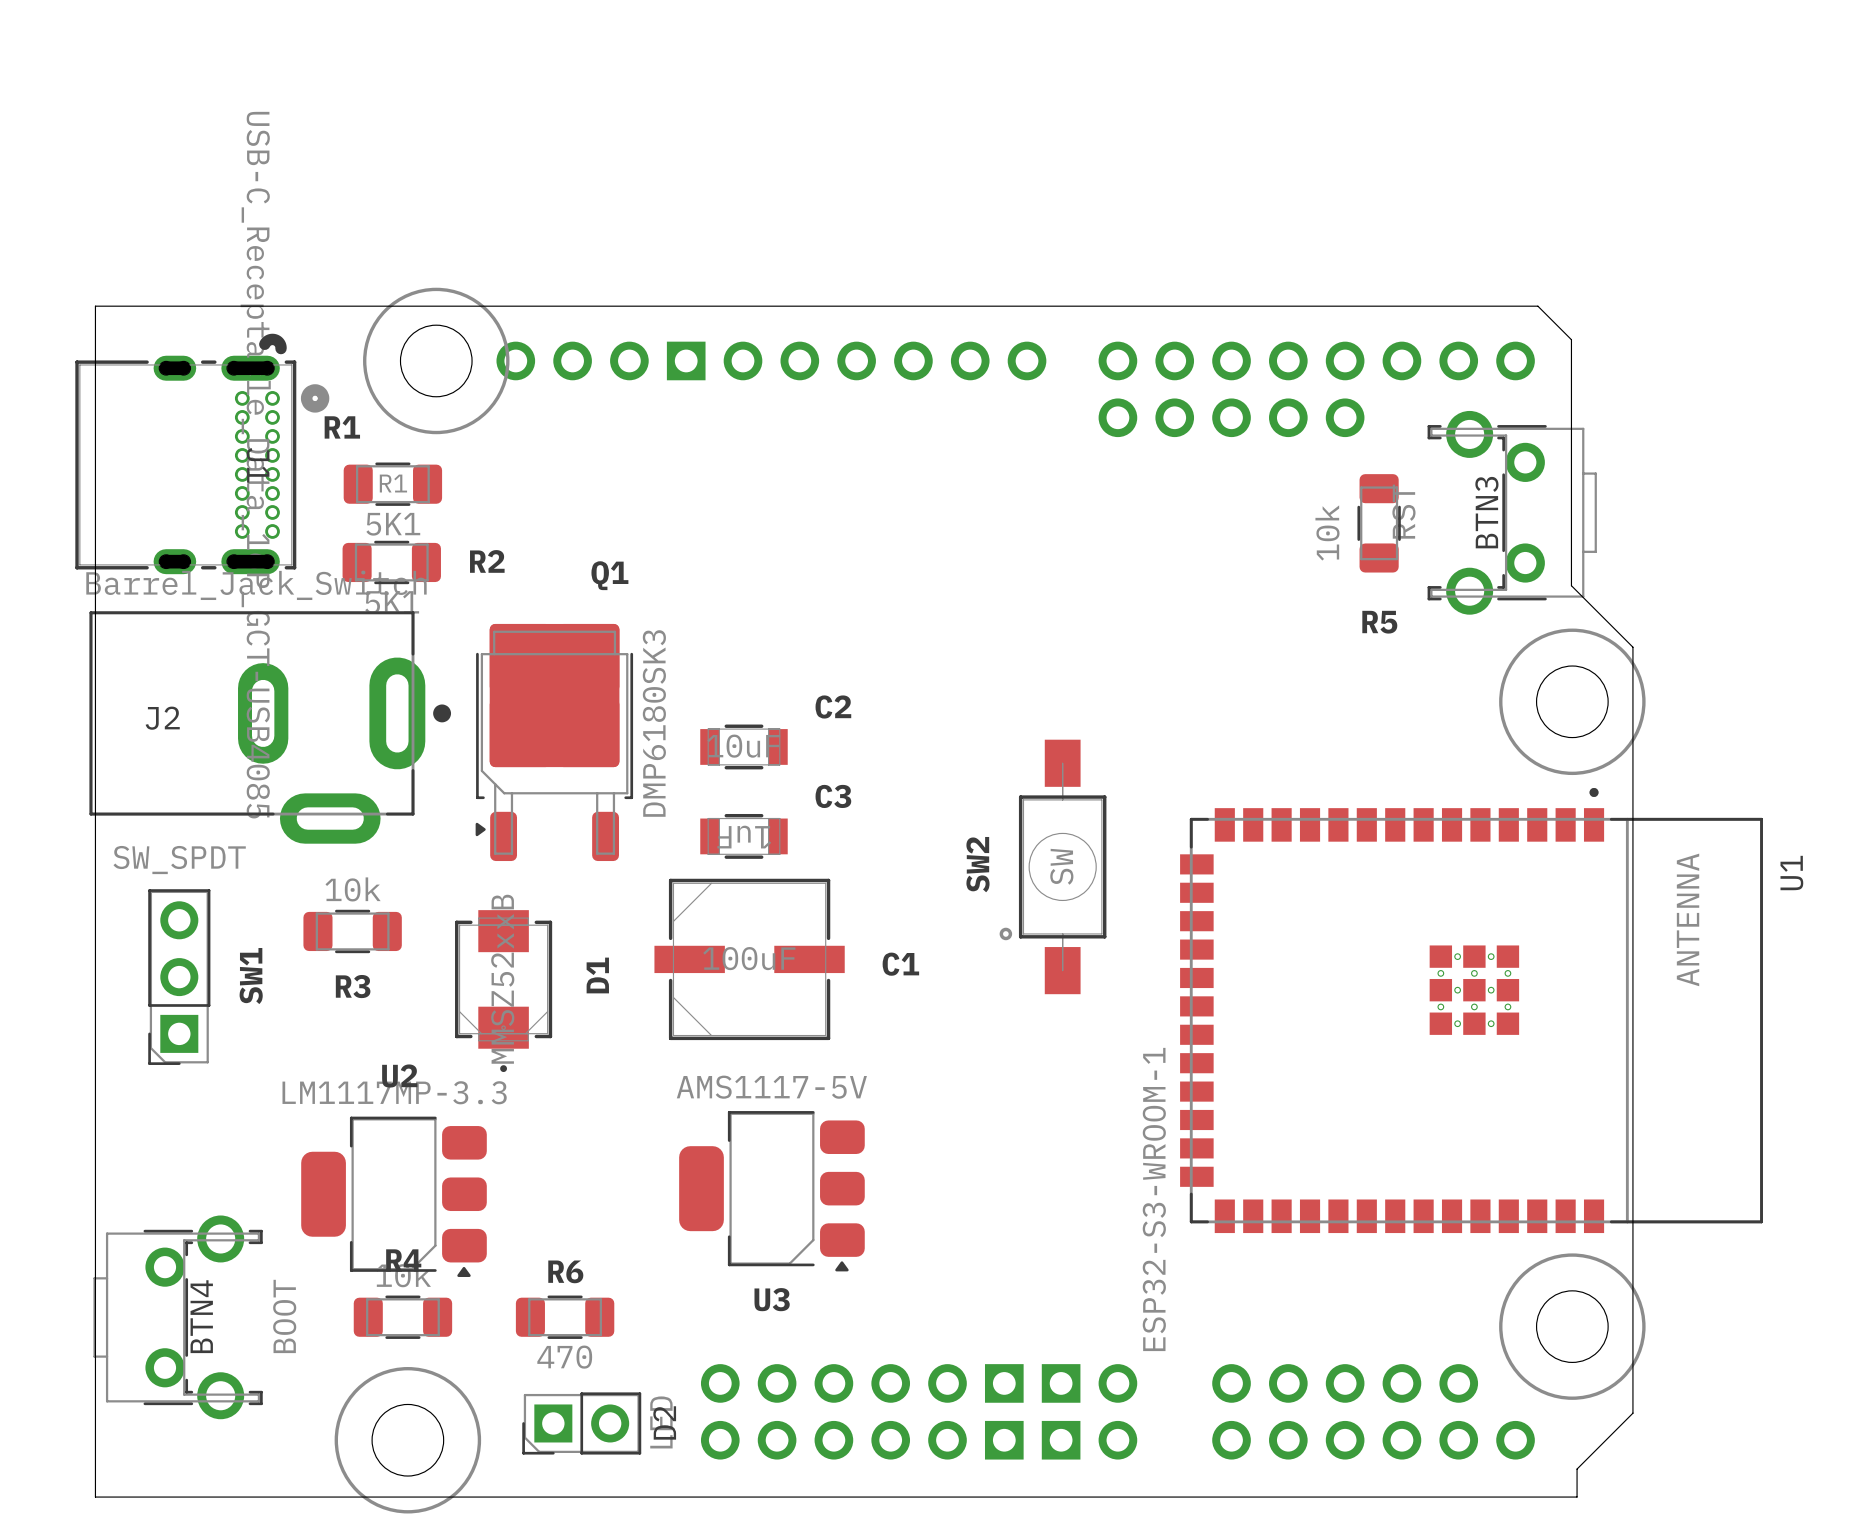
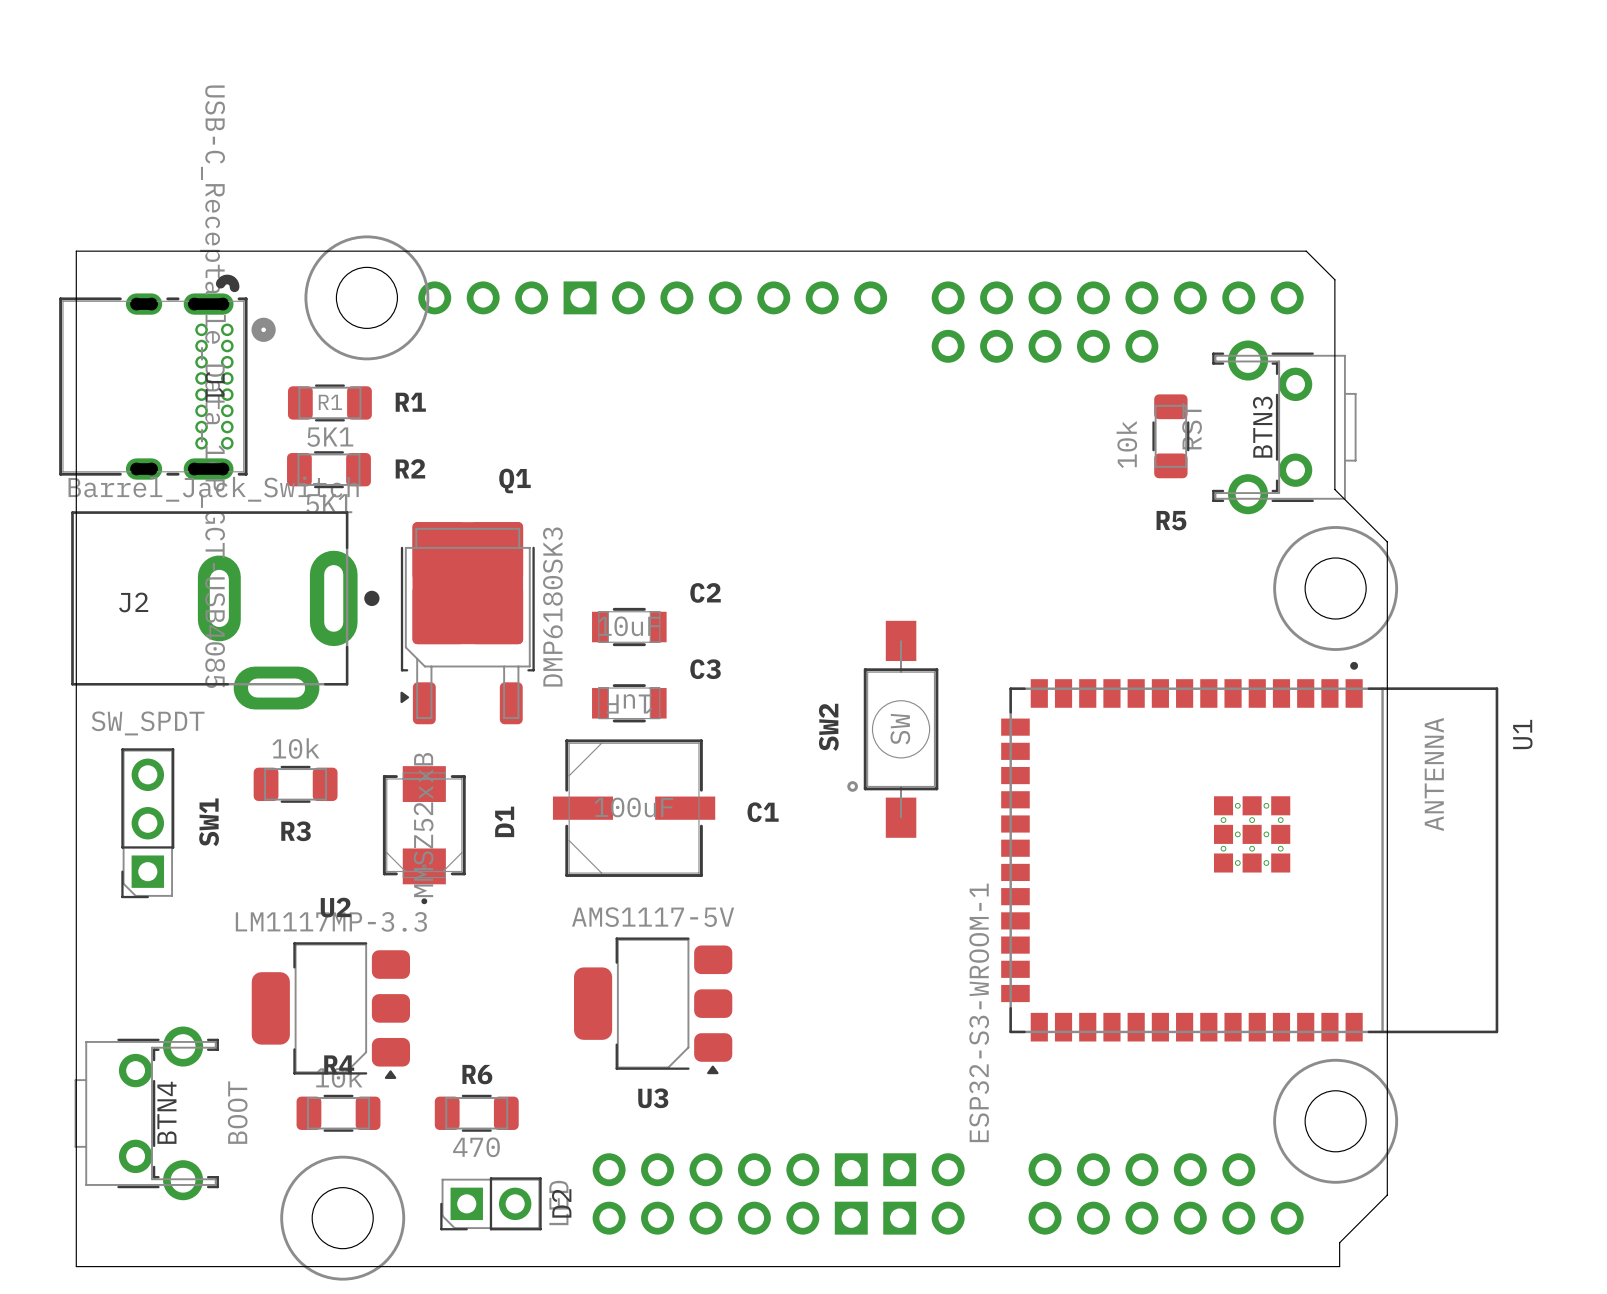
text position: R1 (342, 427) -> R1 (410, 402)

